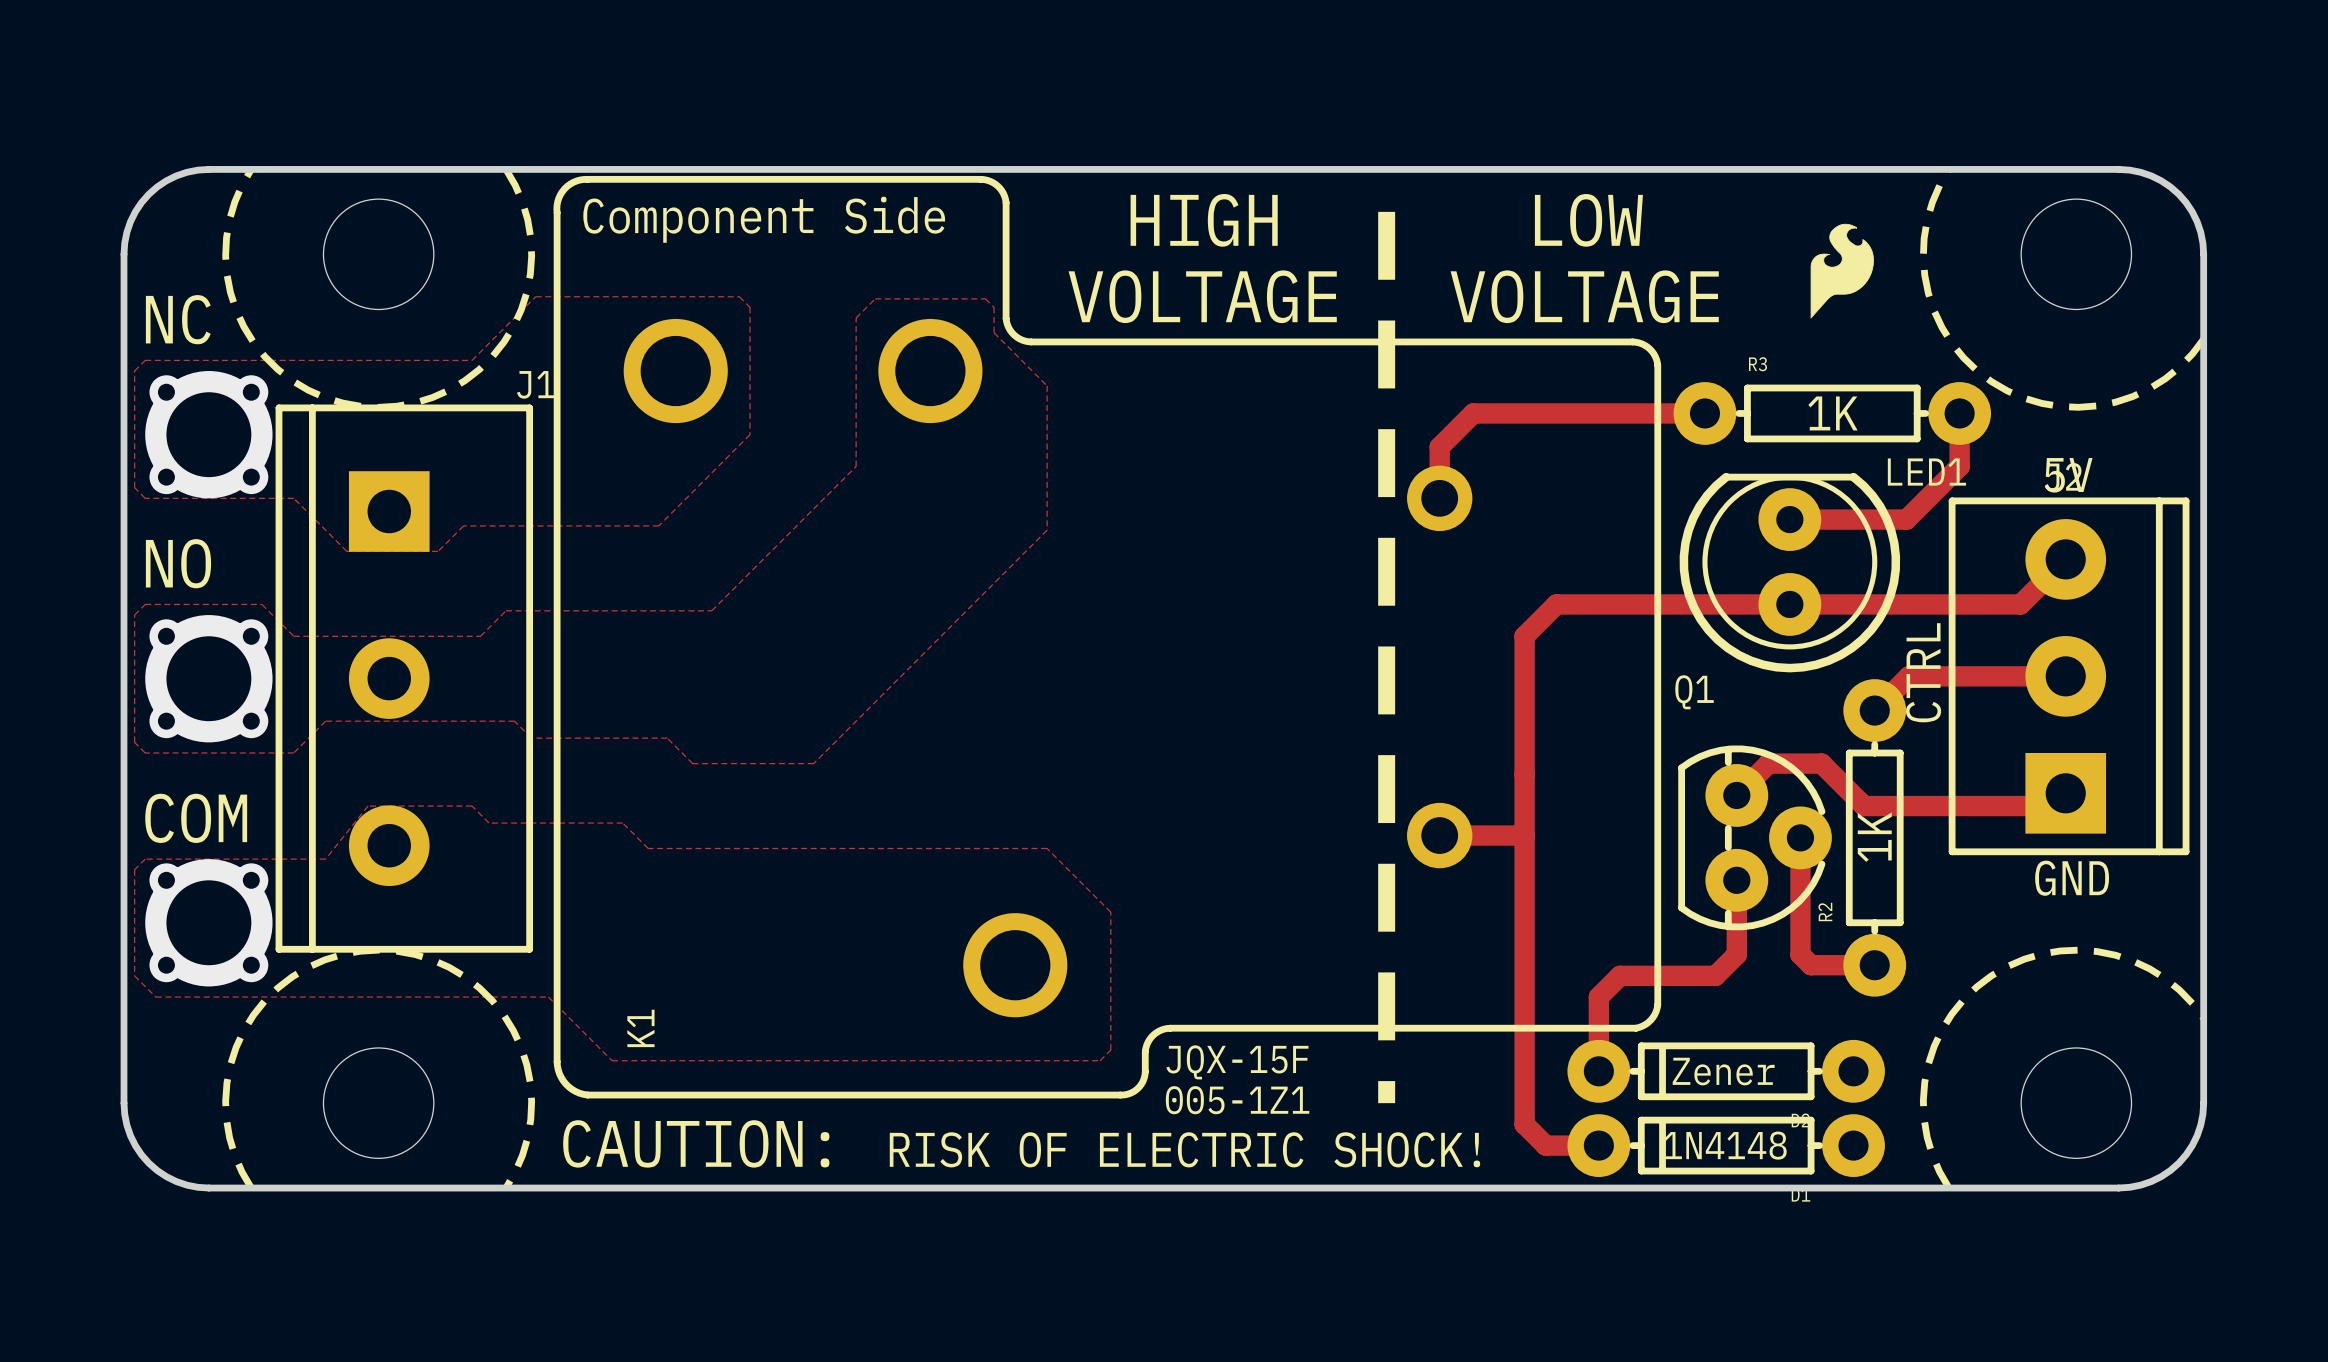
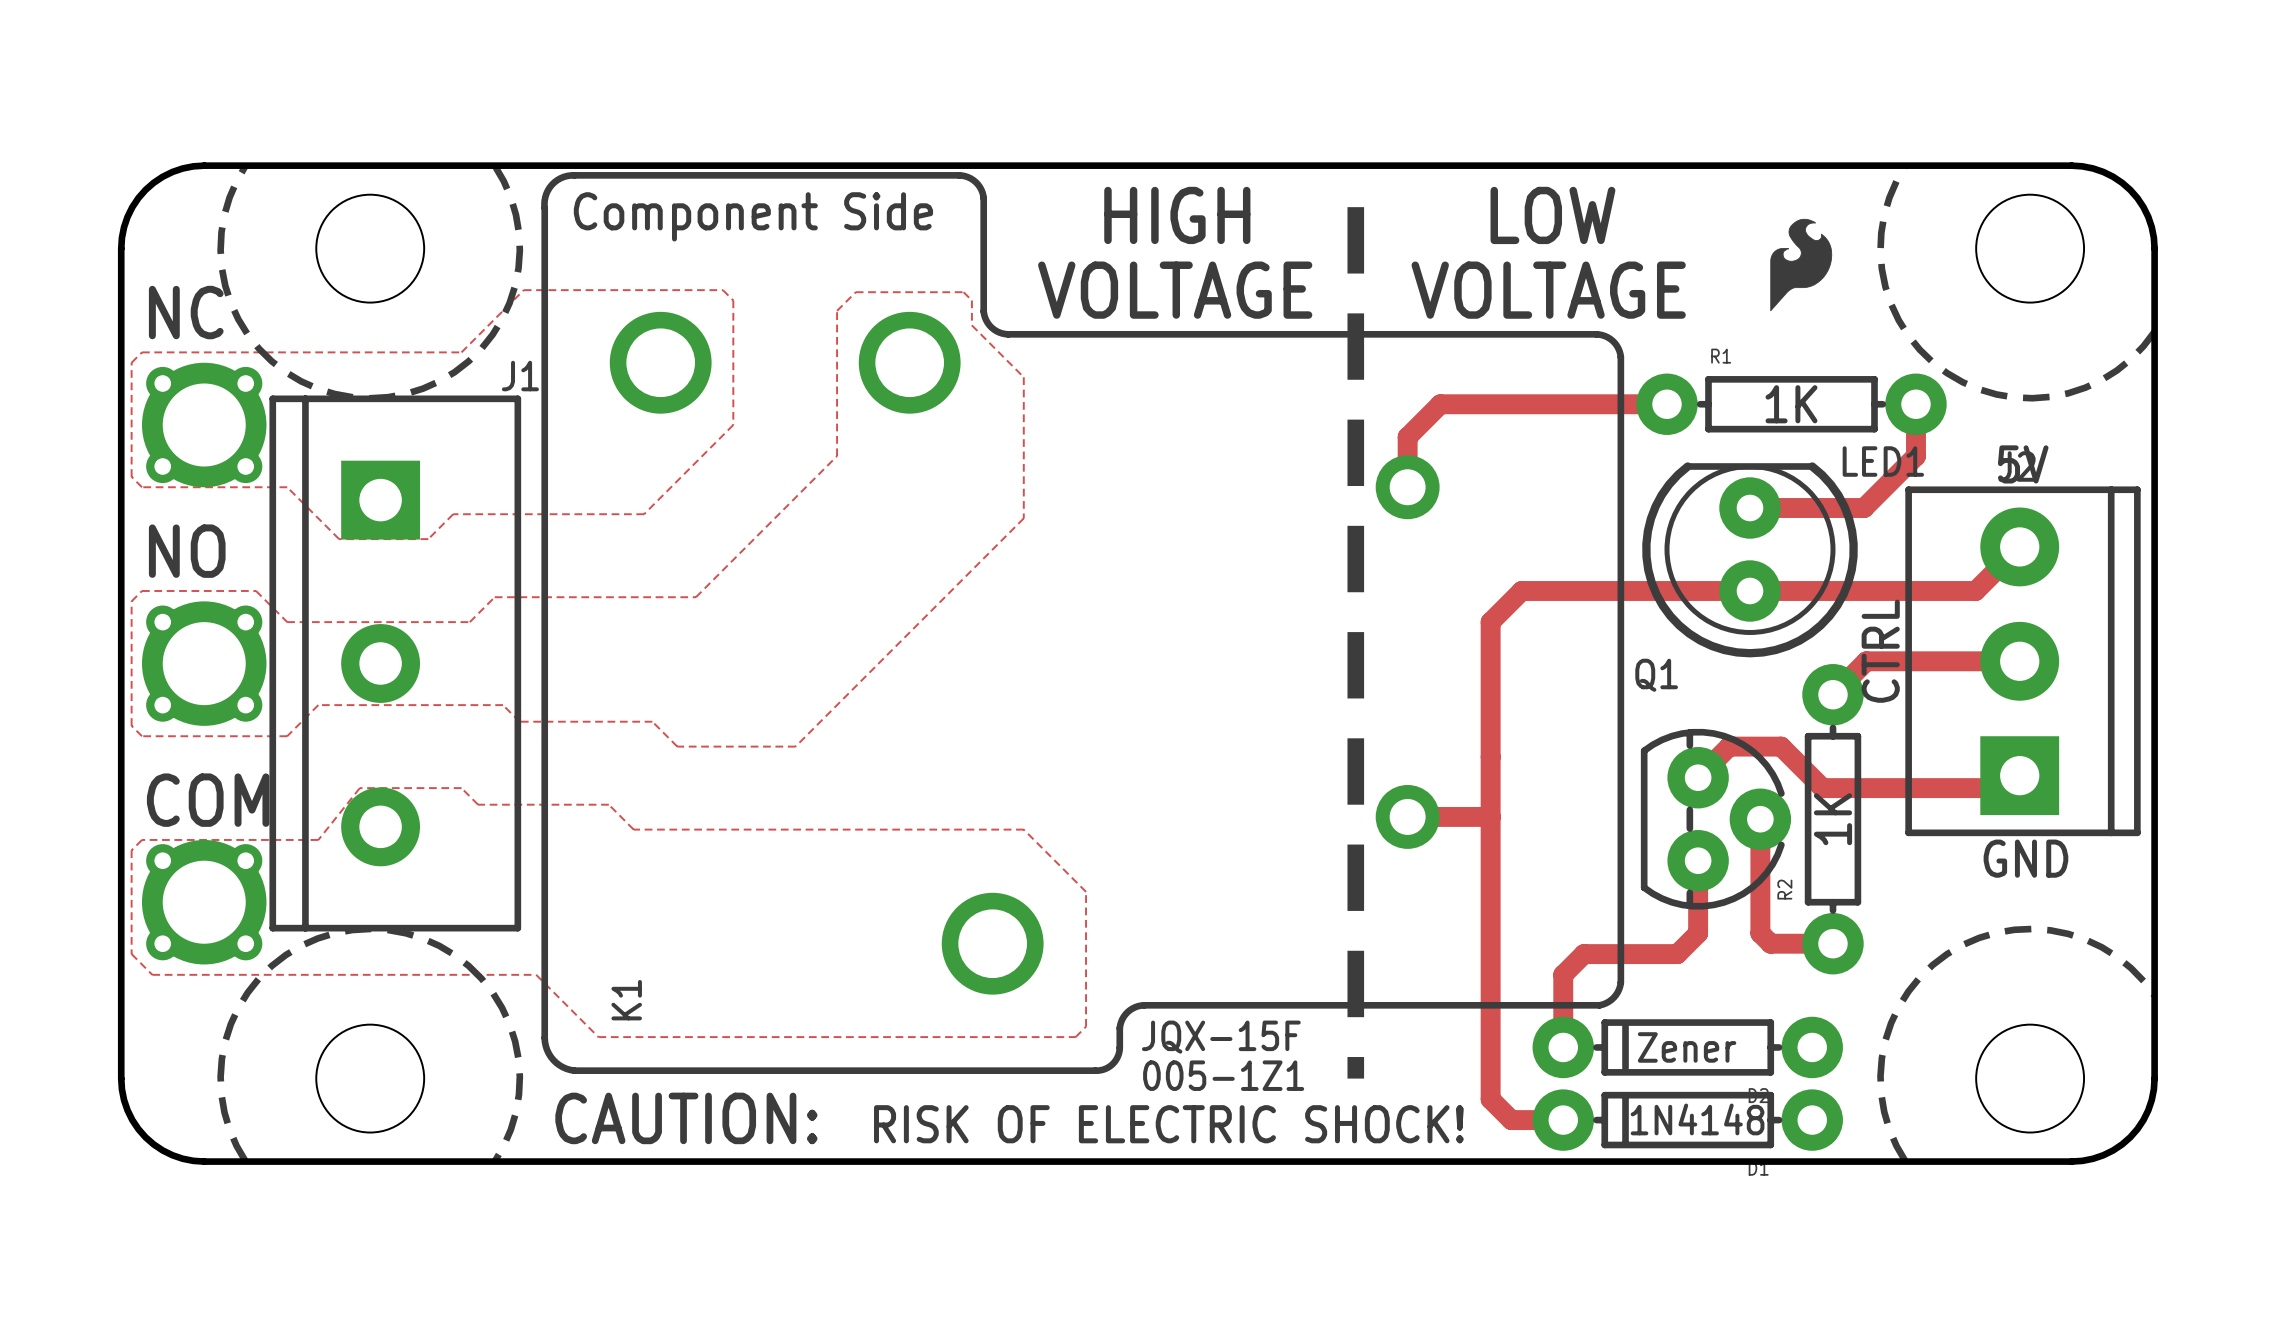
R3 name: R3 (1757, 364) -> R1 (1721, 356)

